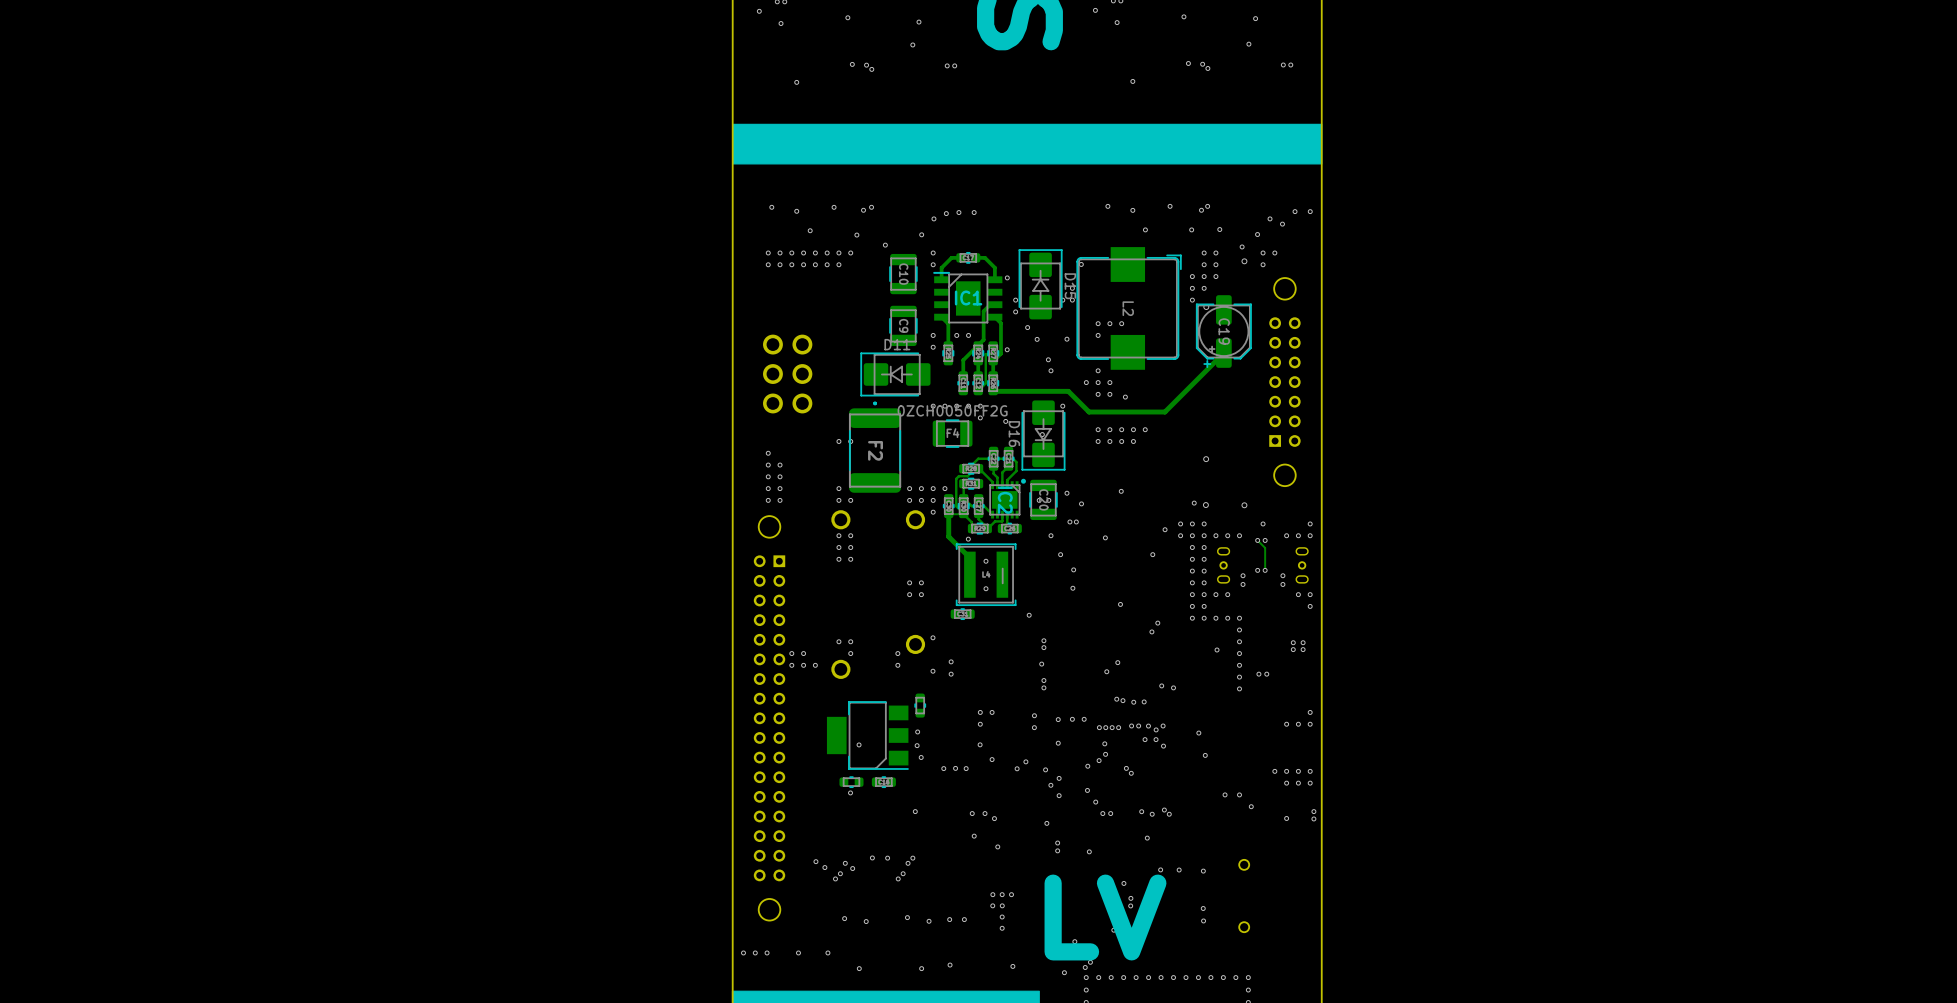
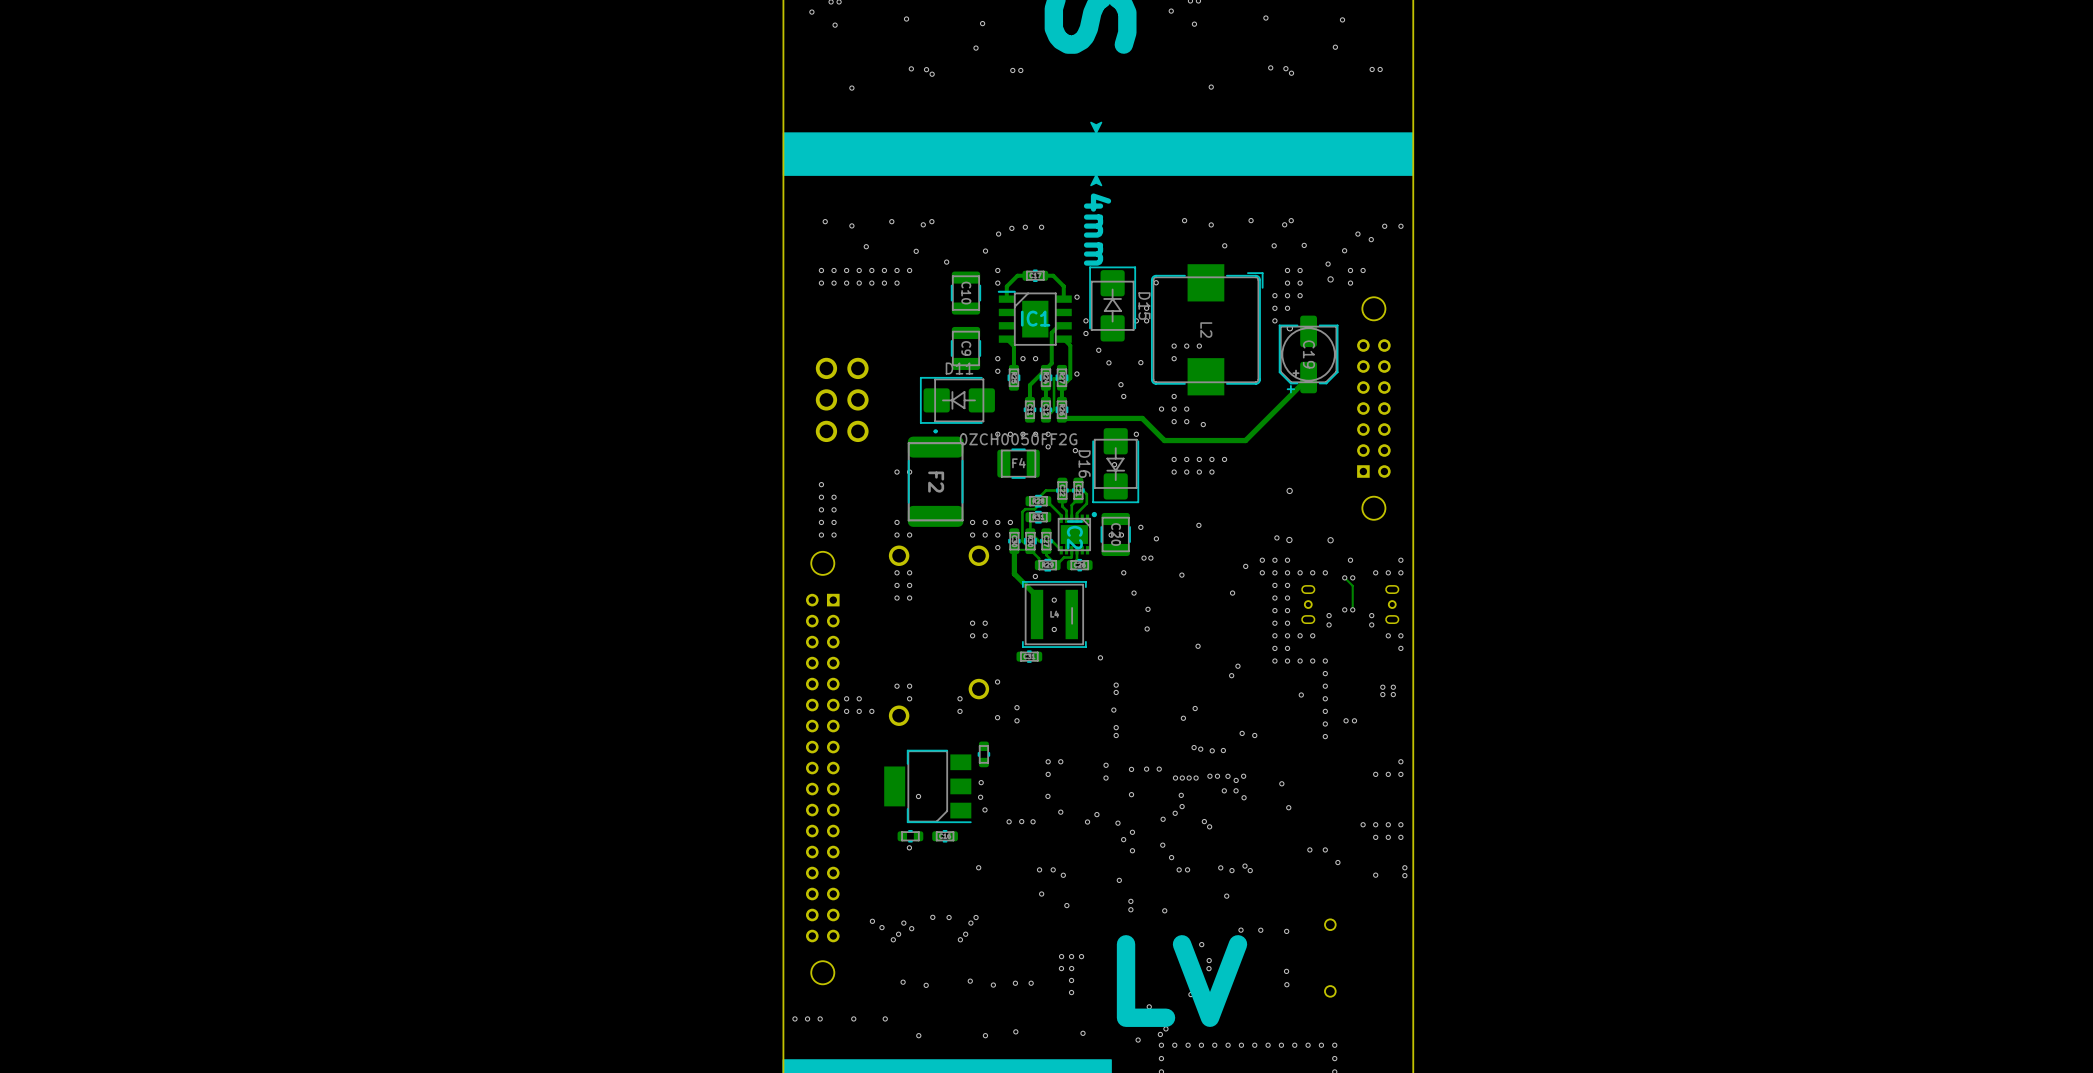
drawing: none -> [1090, 121, 1103, 134]
drawing: none -> [1090, 174, 1103, 187]
text: none -> 4mm (1097, 229)

